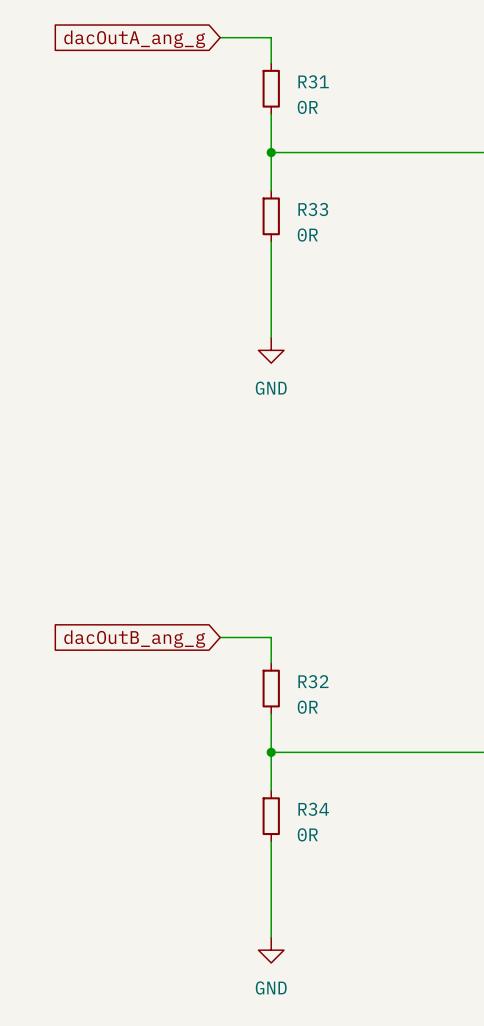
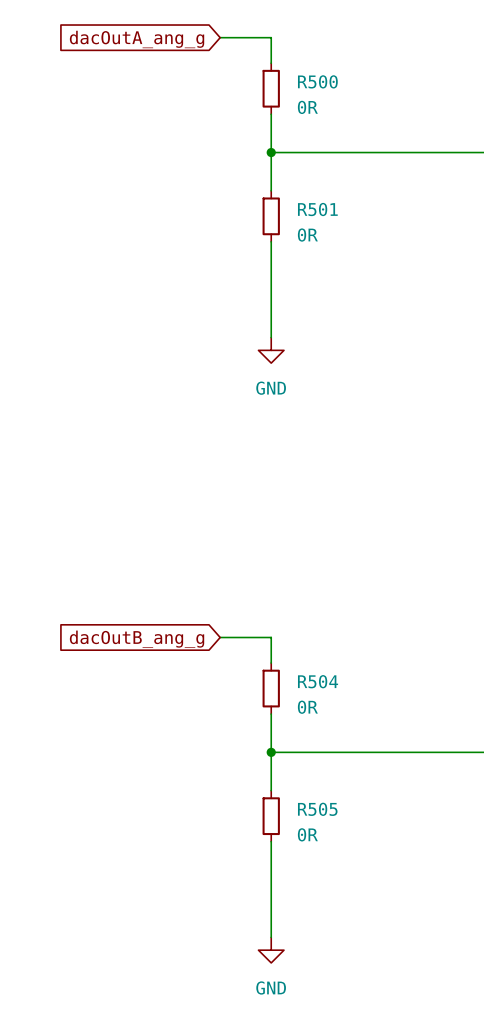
R31 name: R31 (313, 81) -> R500 (317, 81)
R33 name: R33 (313, 209) -> R501 (317, 209)
R32 name: R32 (313, 681) -> R504 (318, 681)
R34 name: R34 (313, 809) -> R505 (317, 809)

